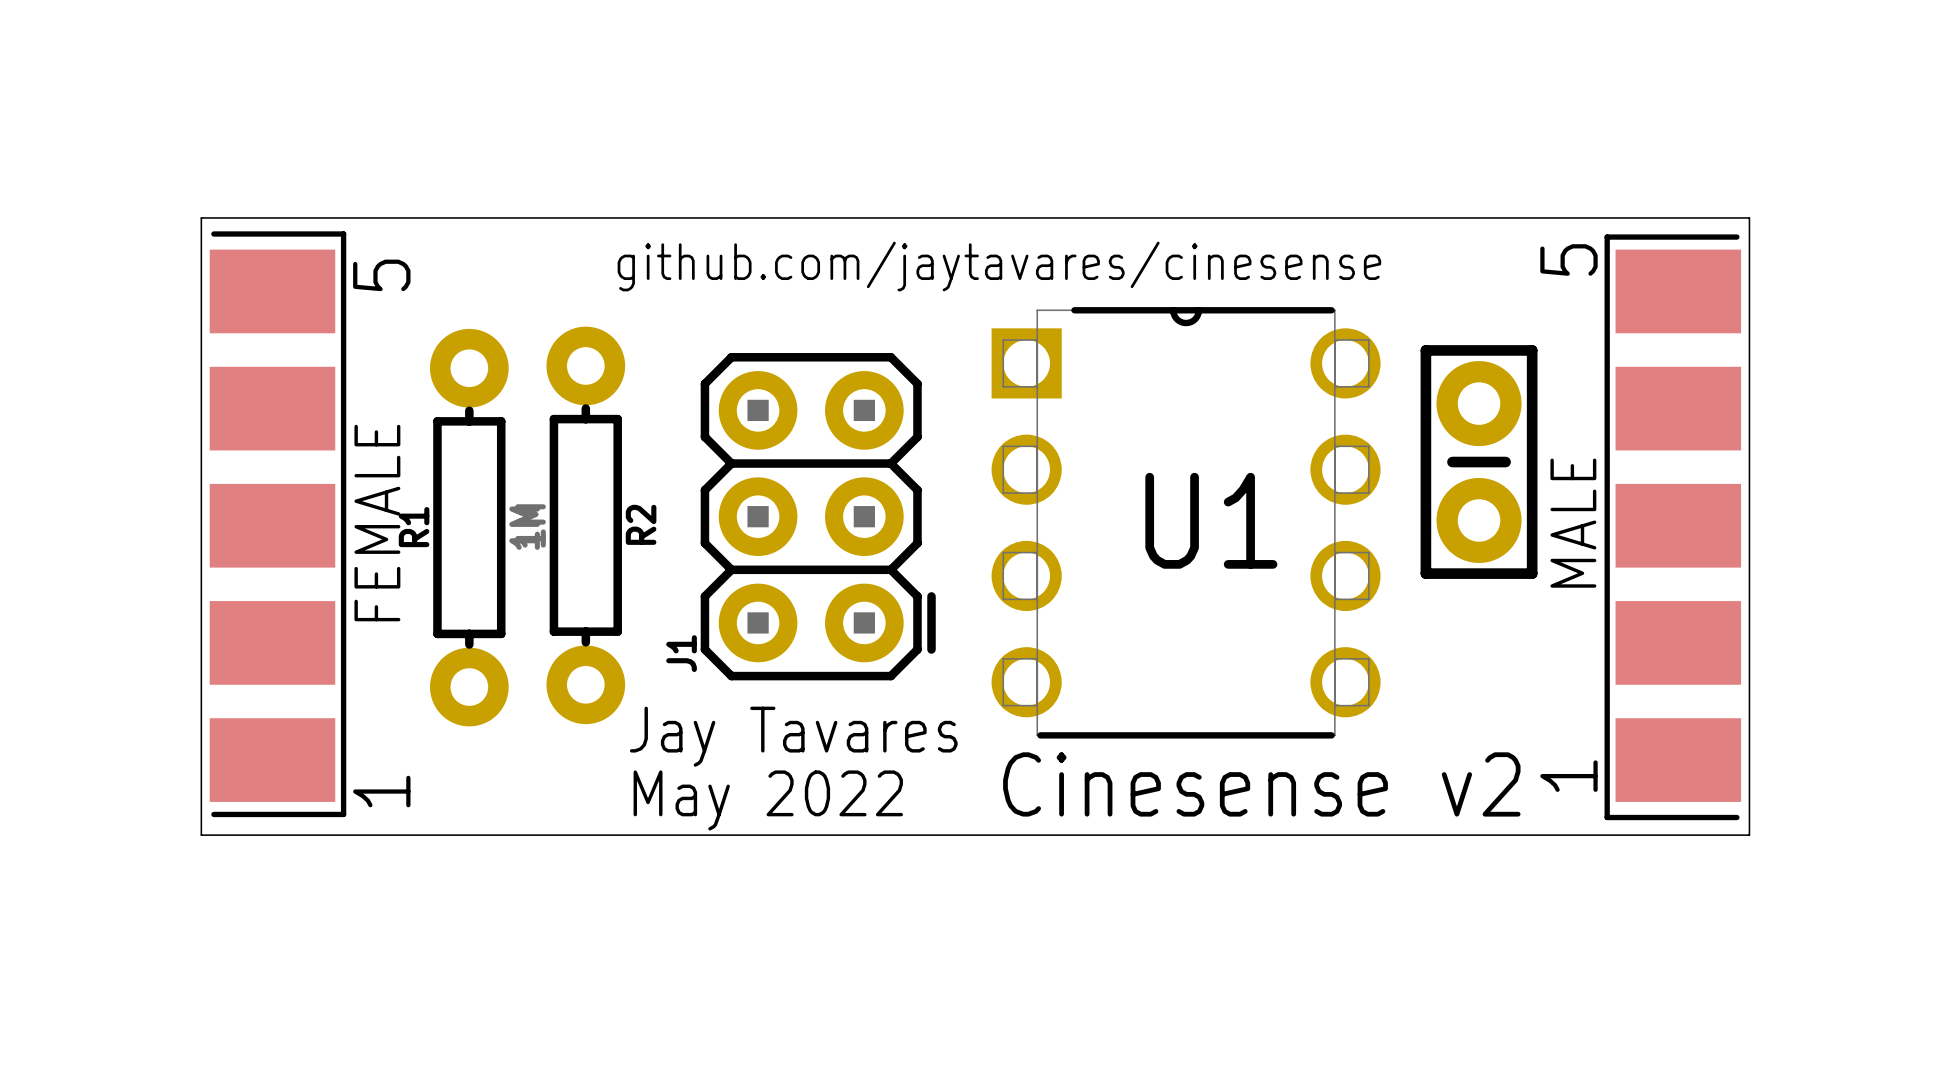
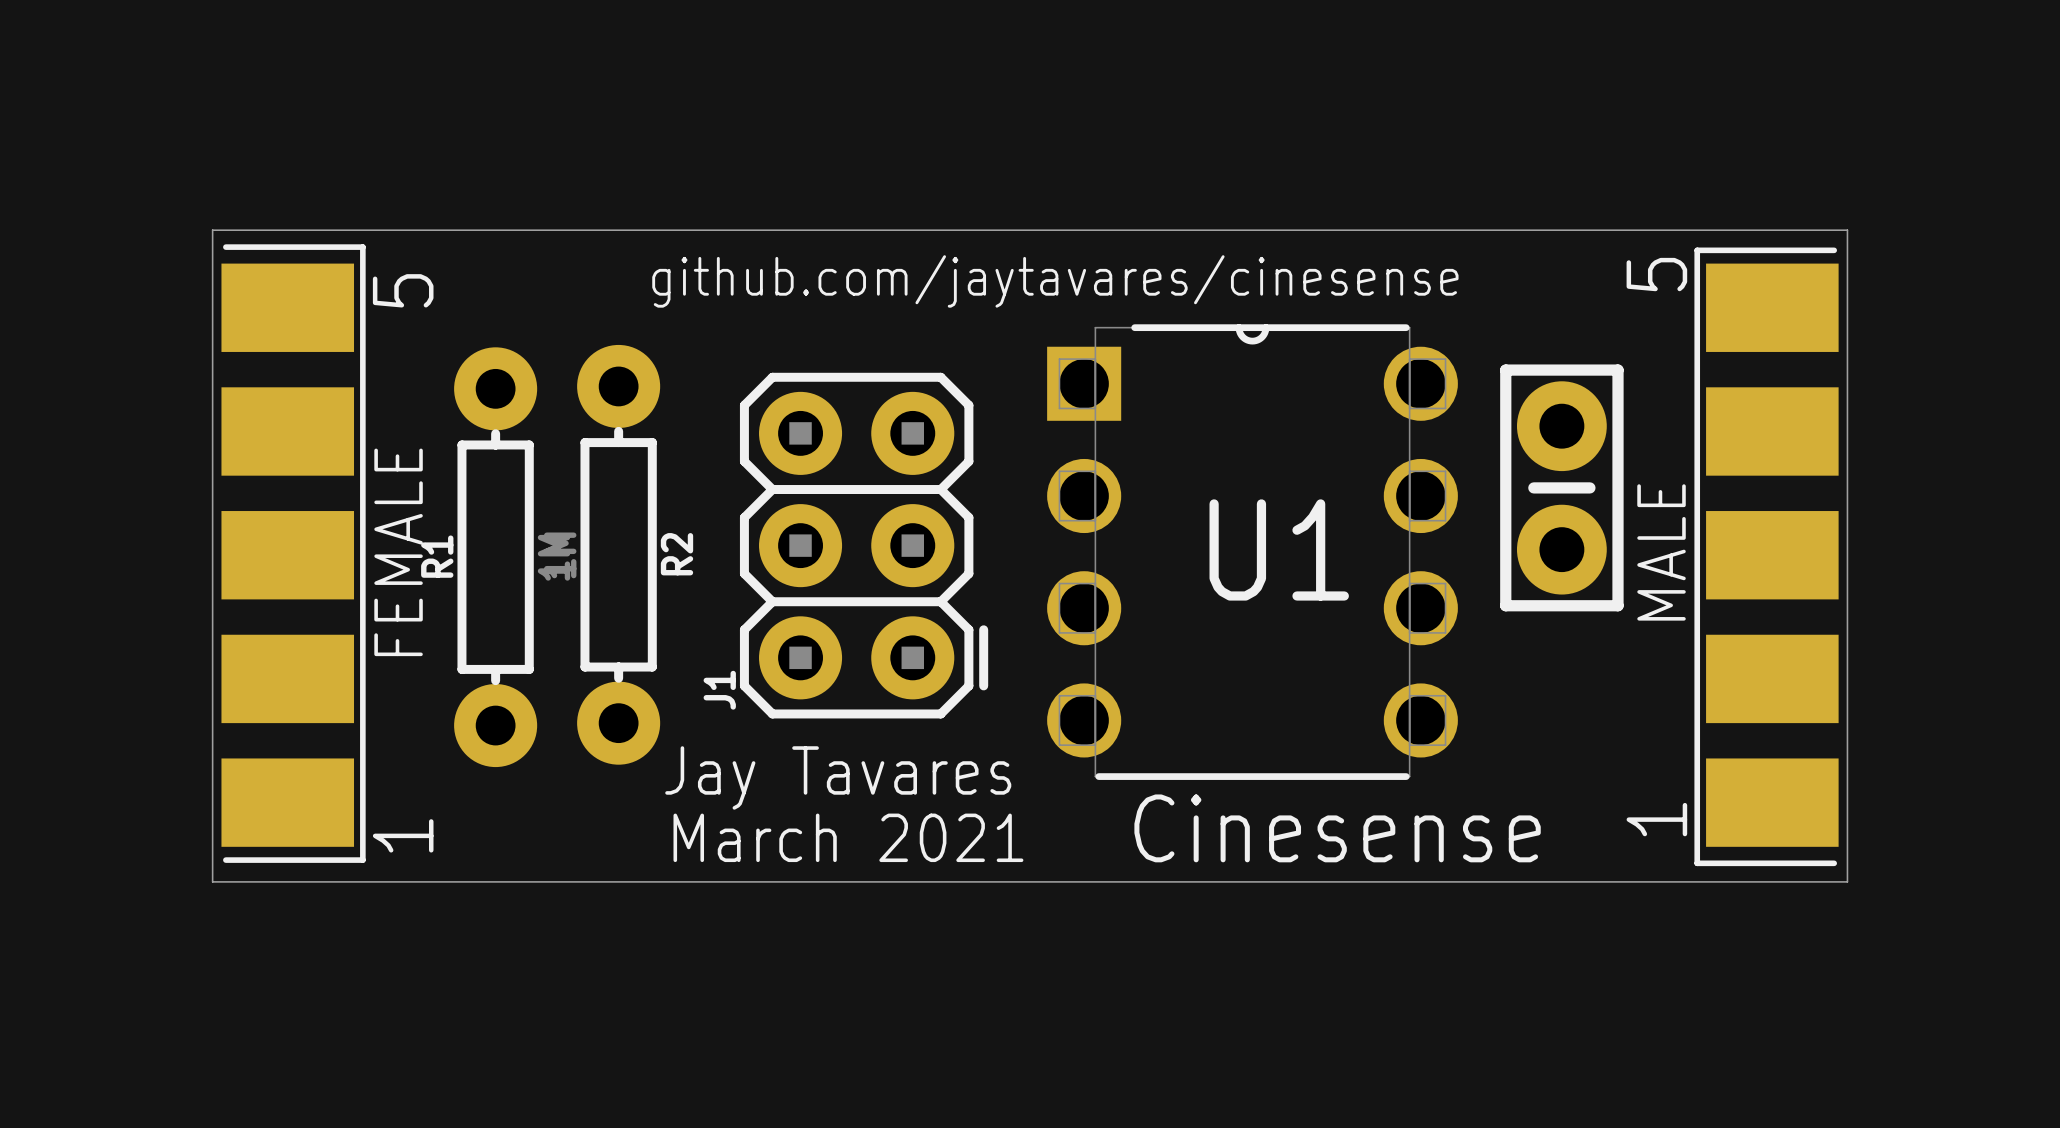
text: Cinesense v2 (1261, 784) -> Cinesense (1337, 828)
text: May 2022 (768, 800) -> March 2021 (848, 837)

